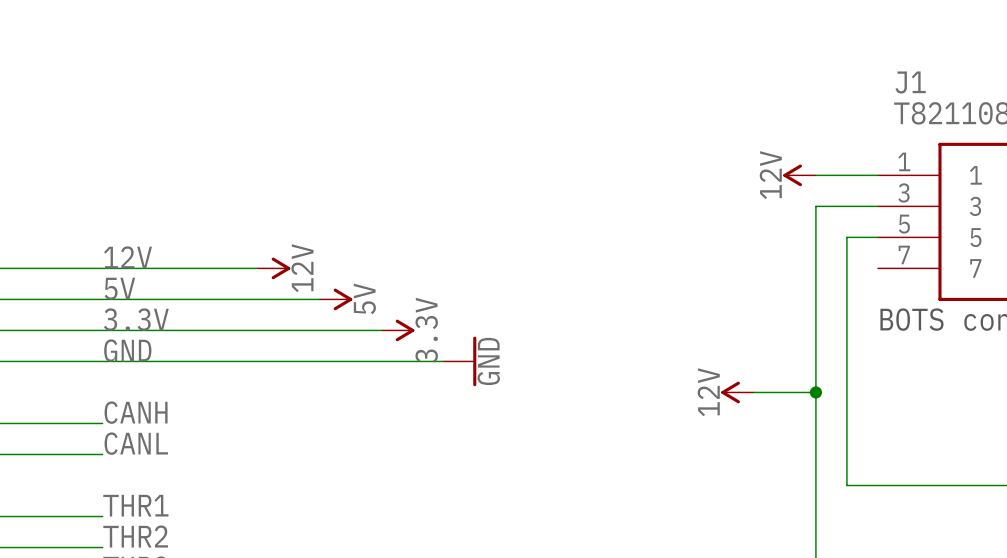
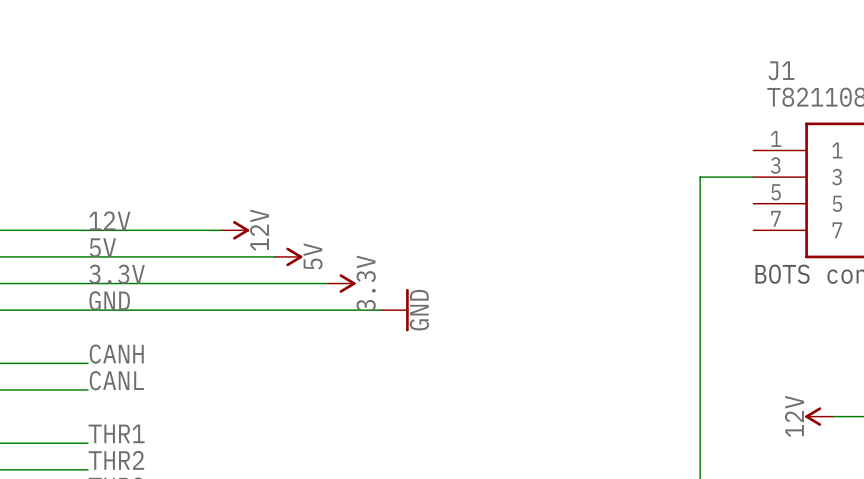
power symbol: 12V (799, 175) -> none
wire: (815, 175) (877, 175) -> none
wire: (877, 237) (846, 237) (846, 485) (971, 485) -> none
power symbol: 12V (737, 392) -> none
wire: (753, 392) (815, 392) -> none
junction: (815, 392) -> none
power symbol: none -> 12V (819, 416)

